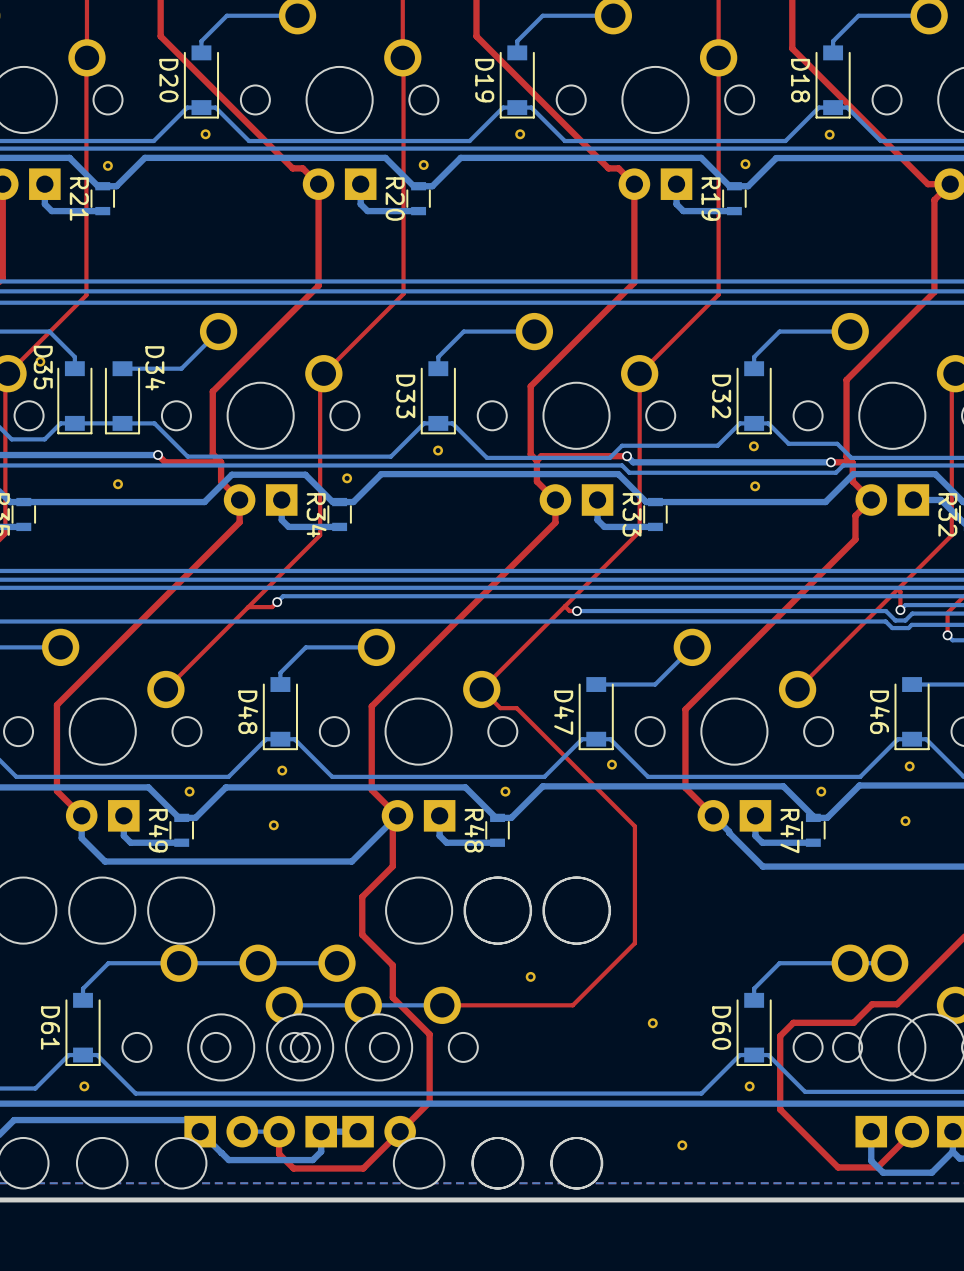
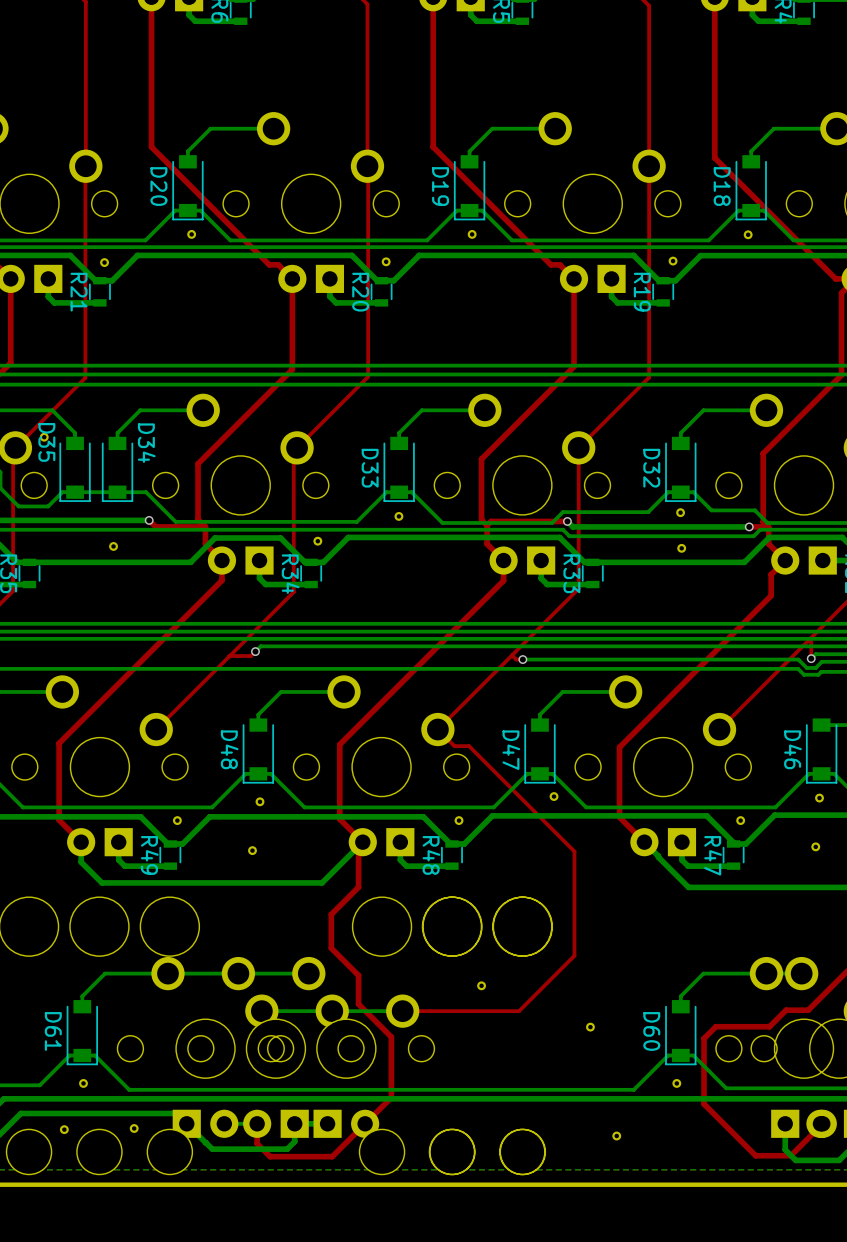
bottom track: (218, 331) (181, 368) (122, 368) -> (203, 410) (140, 410) (117, 433) (117, 443)
bottom track: (692, 647) (655, 684) (596, 684) -> (625, 691) (562, 691) (539, 714) (539, 725)
part: none -> (134, 1128)
part: none -> (64, 1129)

